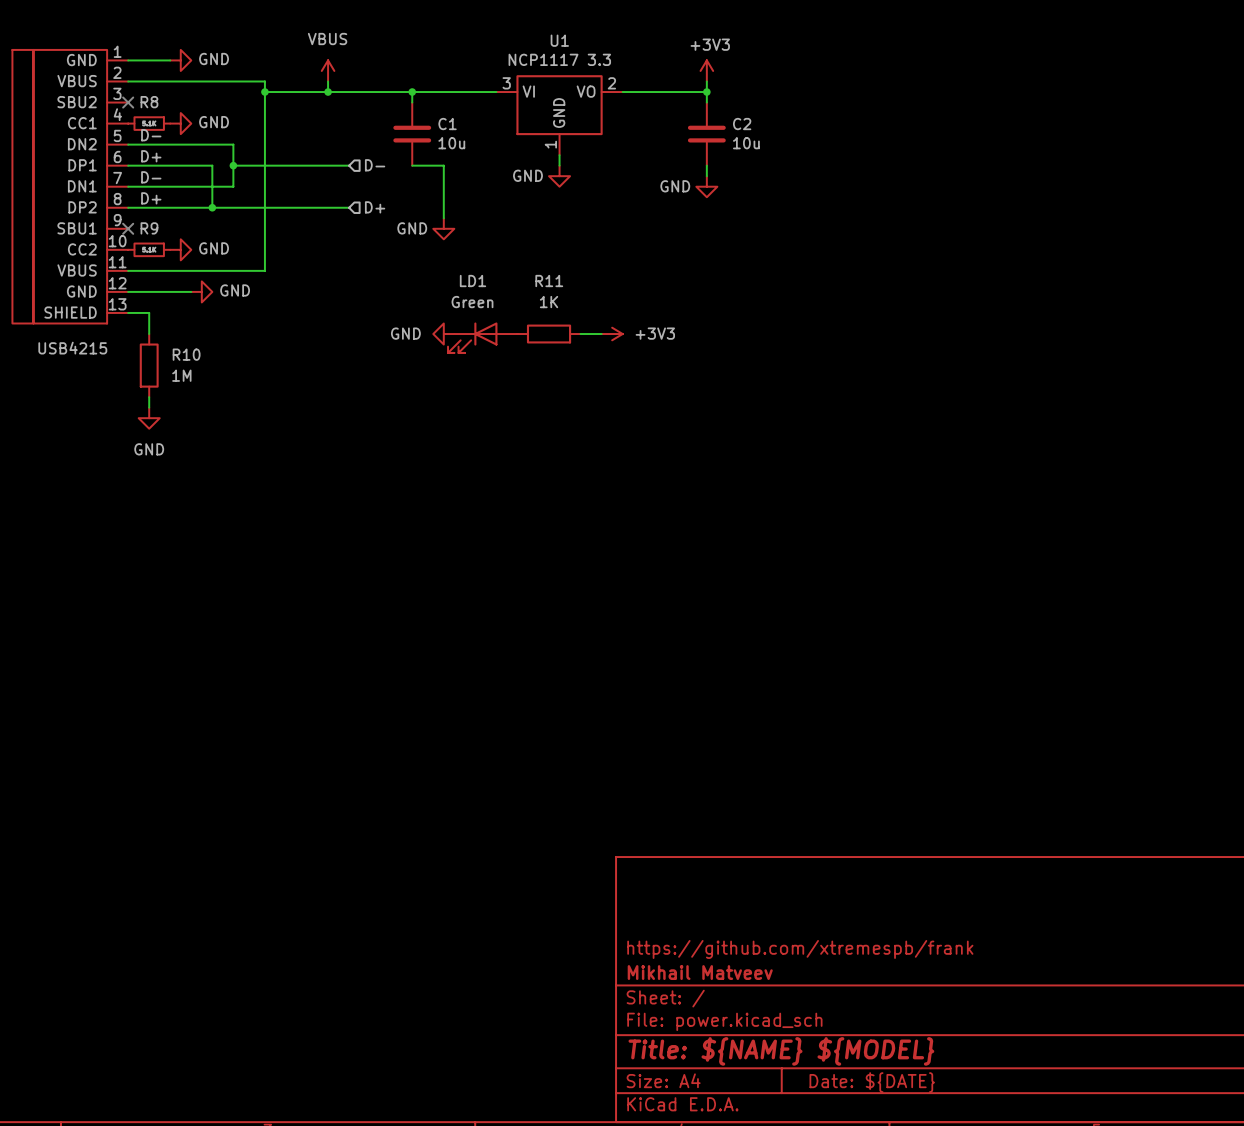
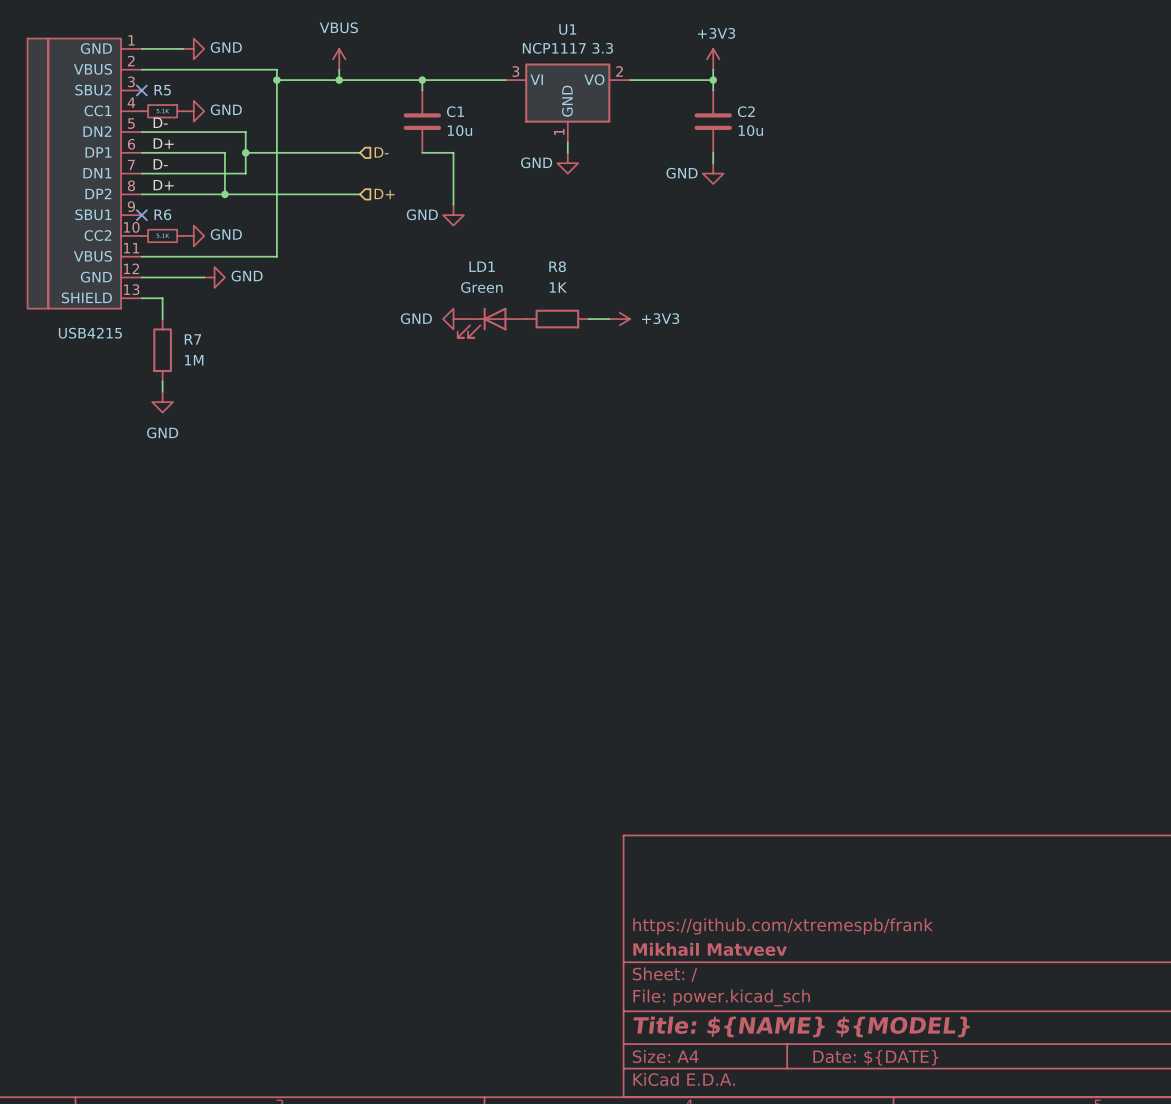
R8 name: R8 (149, 102) -> R5 (162, 90)
R9 name: R9 (149, 228) -> R6 (162, 214)
R11 name: R11 (549, 281) -> R8 (557, 266)
R10 name: R10 (186, 354) -> R7 (192, 339)

